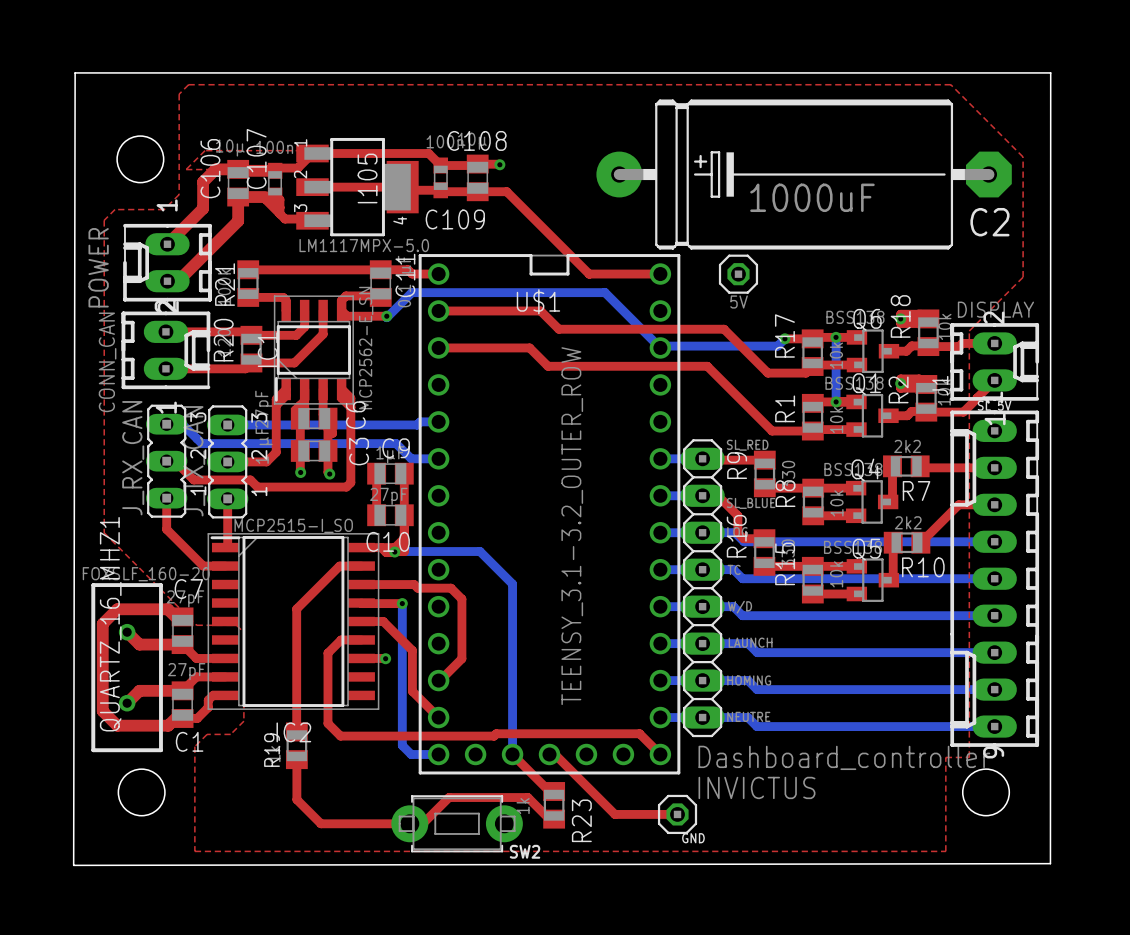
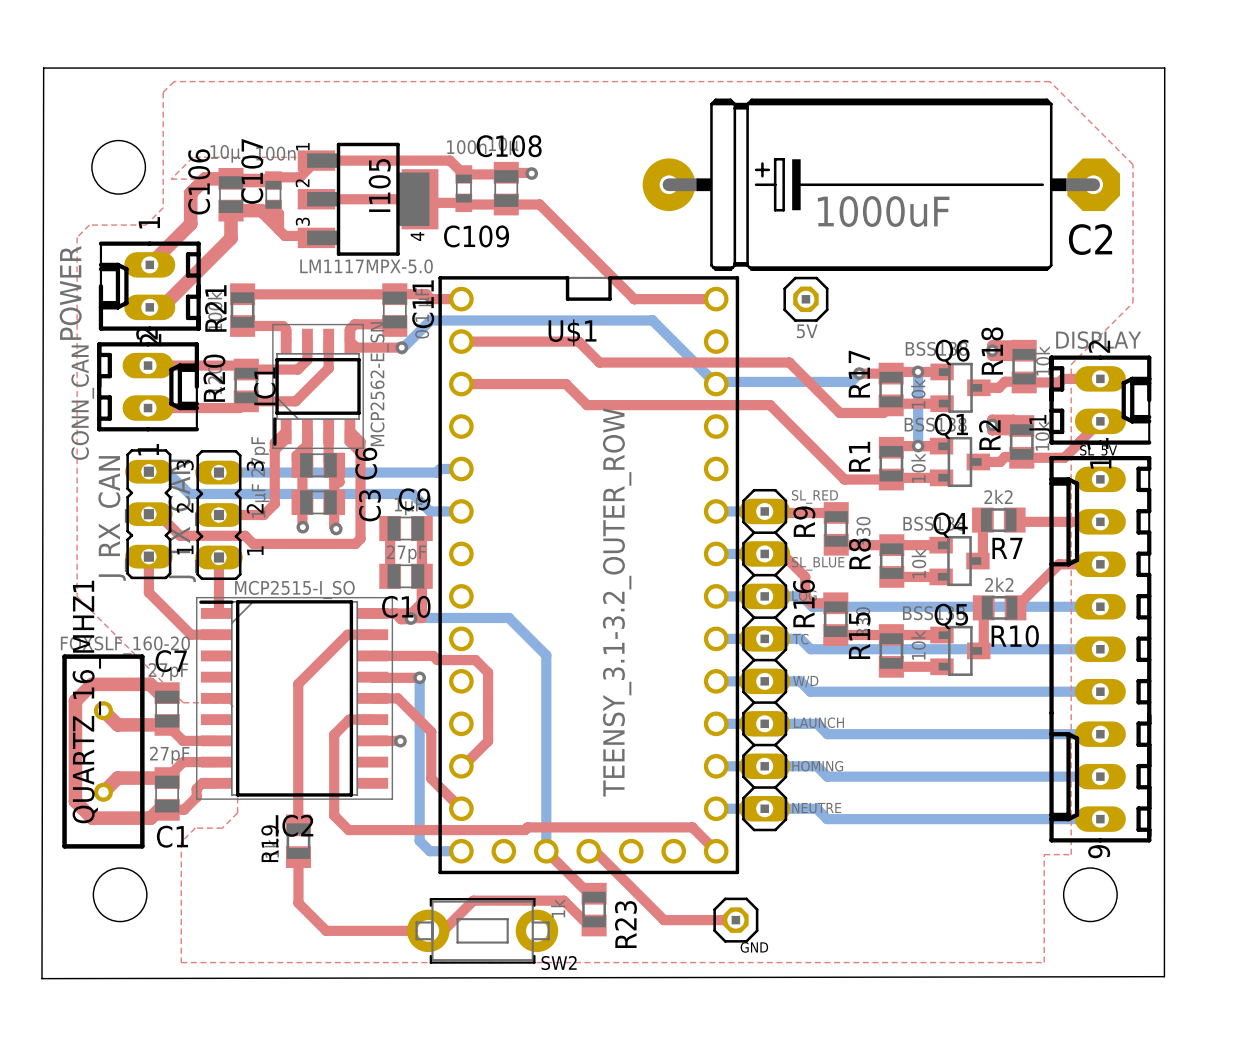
text: Dashboard_controller (844, 757) -> none
text: INVICTUS (756, 787) -> none

